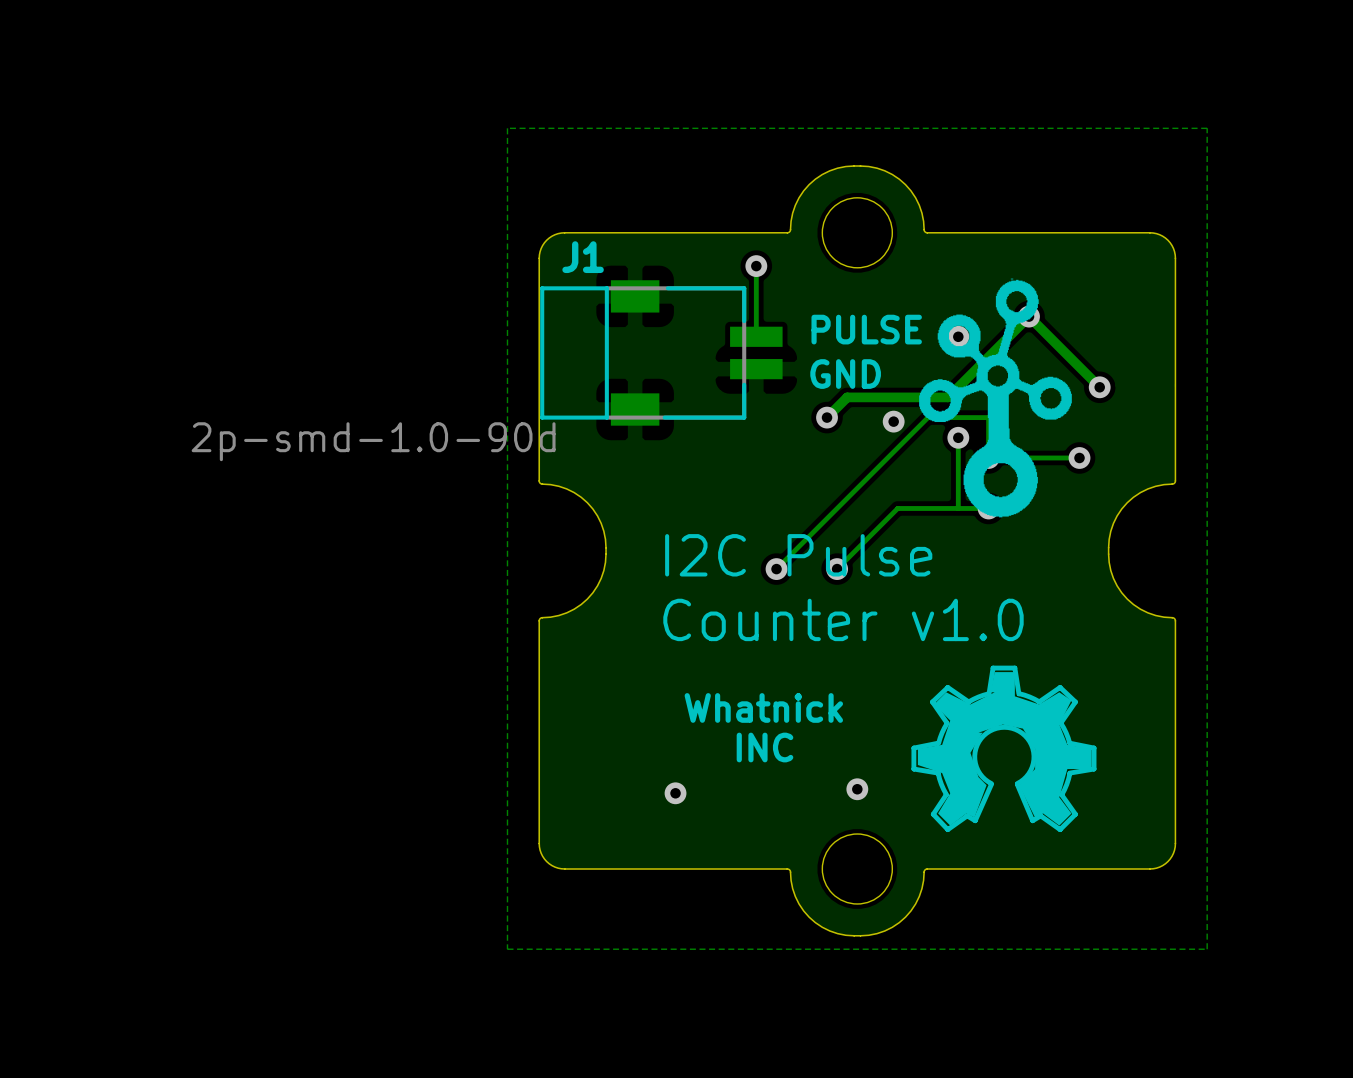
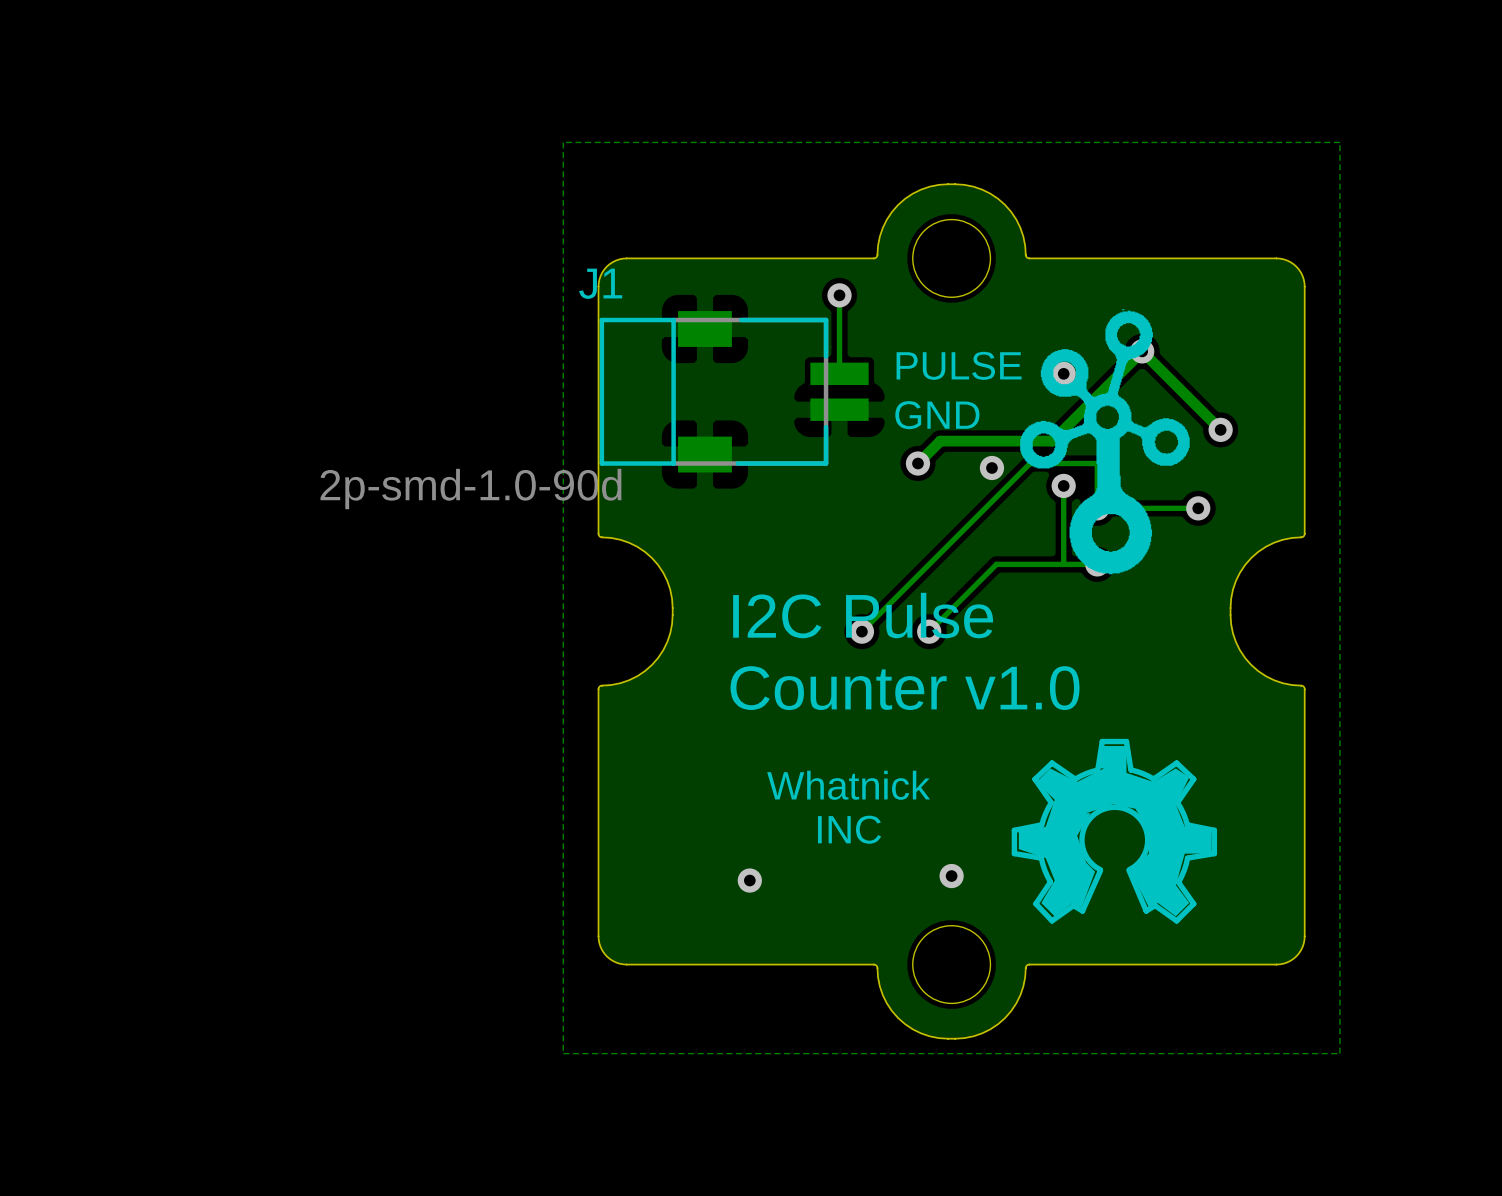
J1 name position: J1 (583, 257) -> J1 (600, 283)

